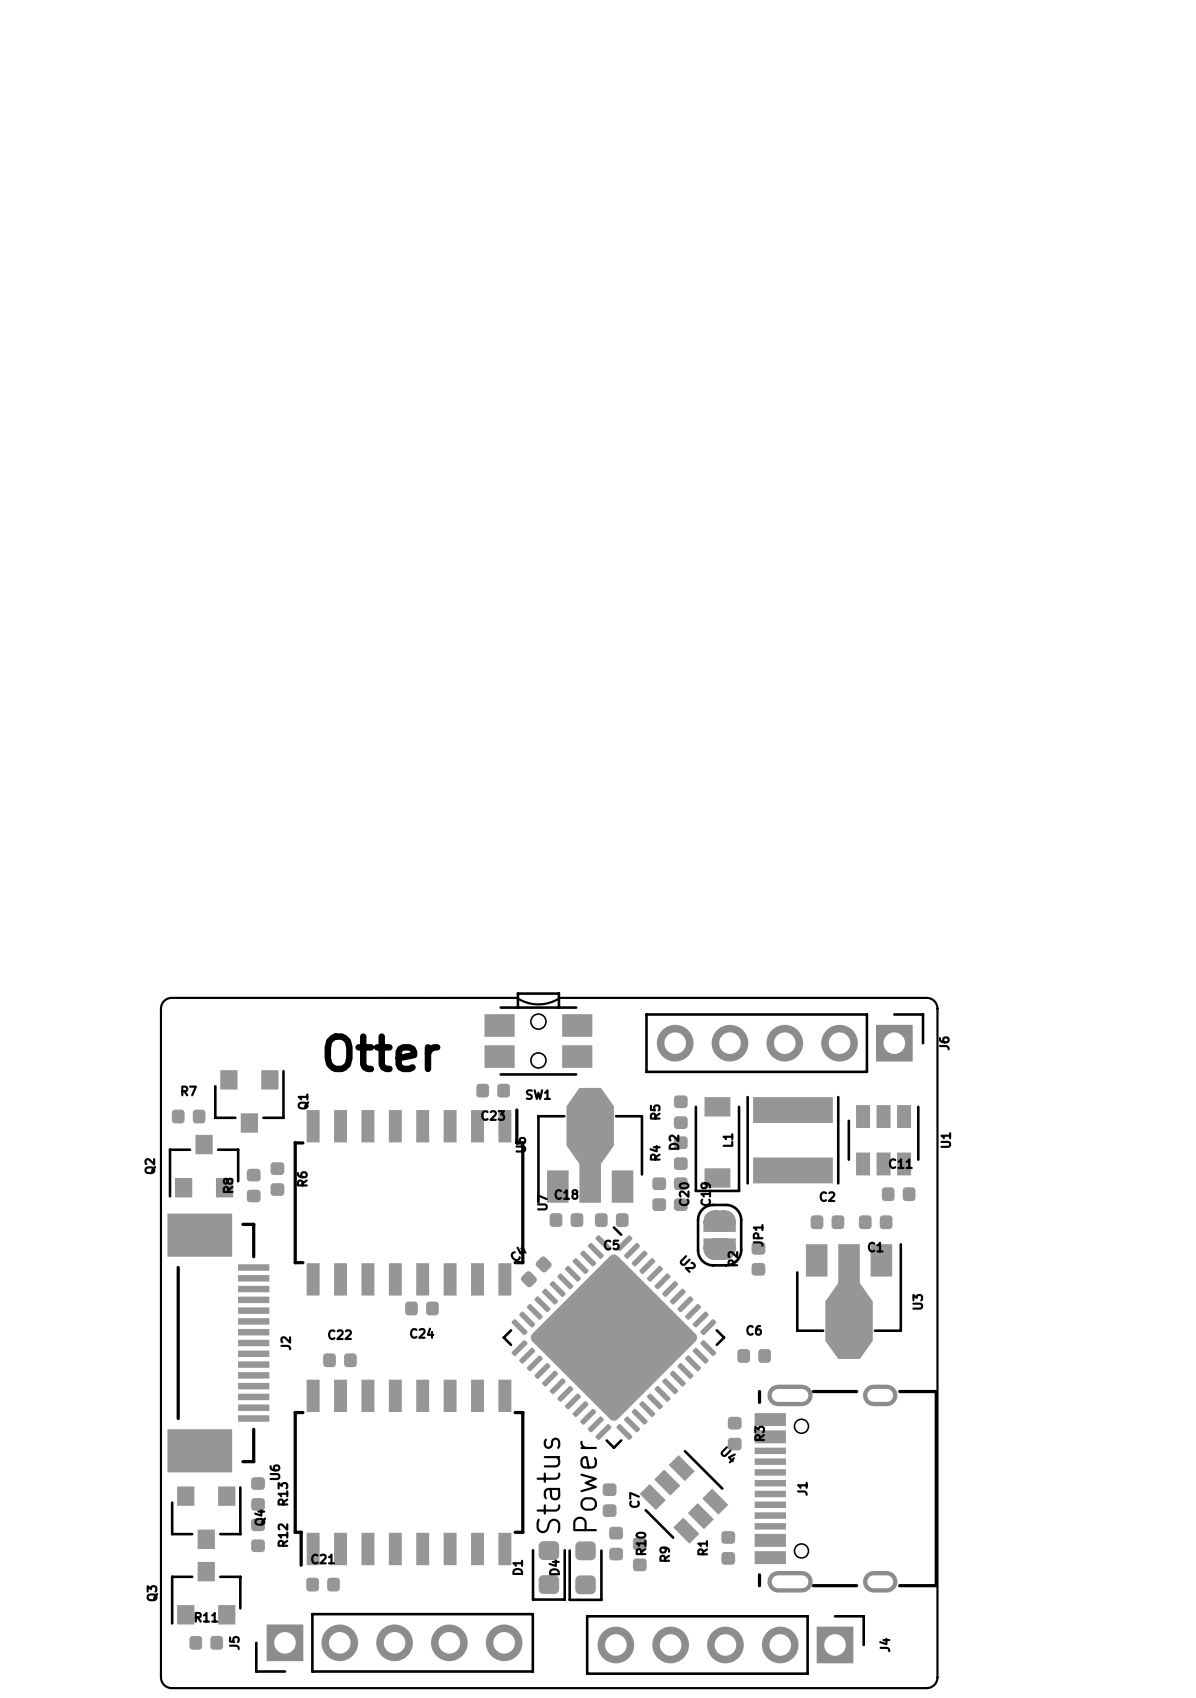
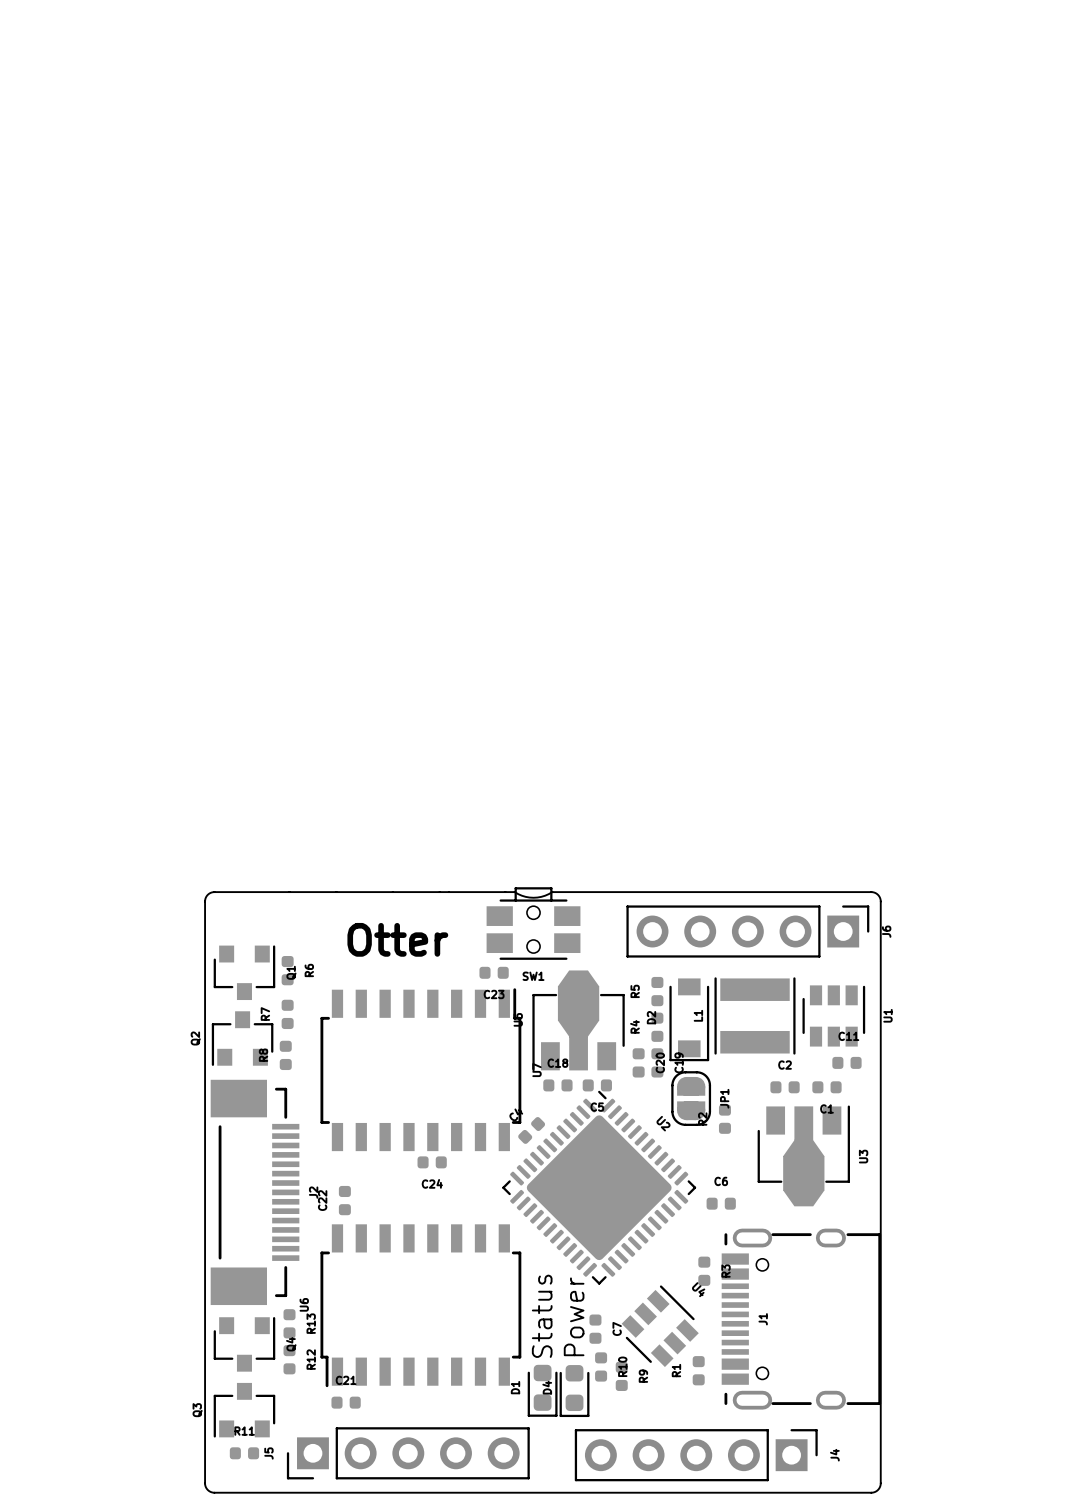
Q1 position: (249, 1101) -> (244, 972)
R7 rotation: 0° (188, 1116) -> 90° clockwise (287, 1014)
R7 position: (188, 1116) -> (287, 1014)
R6 position: (277, 1179) -> (287, 970)
C22 rotation: 0° (339, 1360) -> 90° clockwise (344, 1200)

